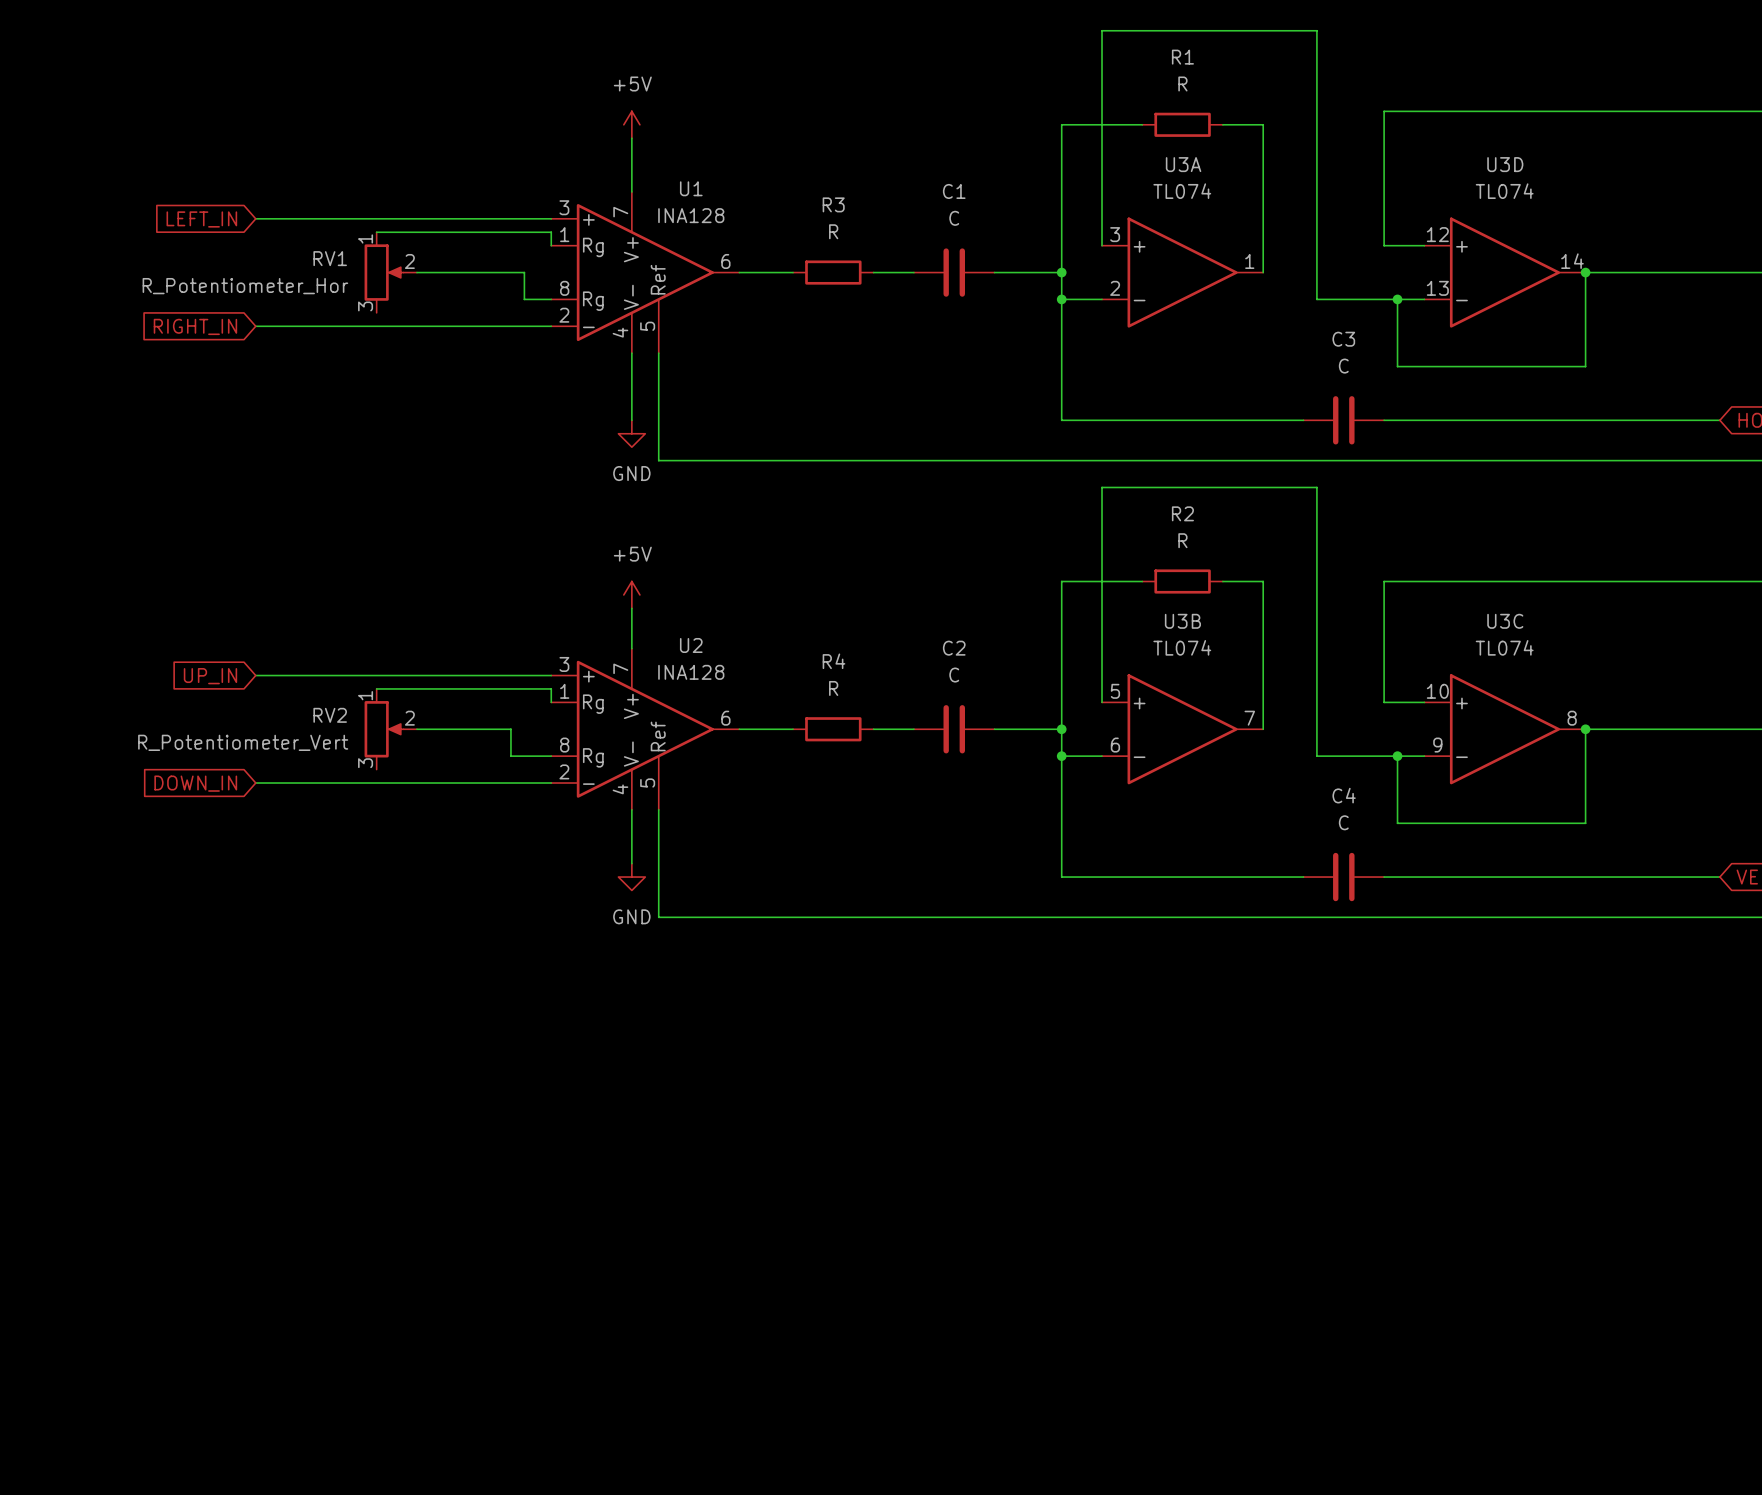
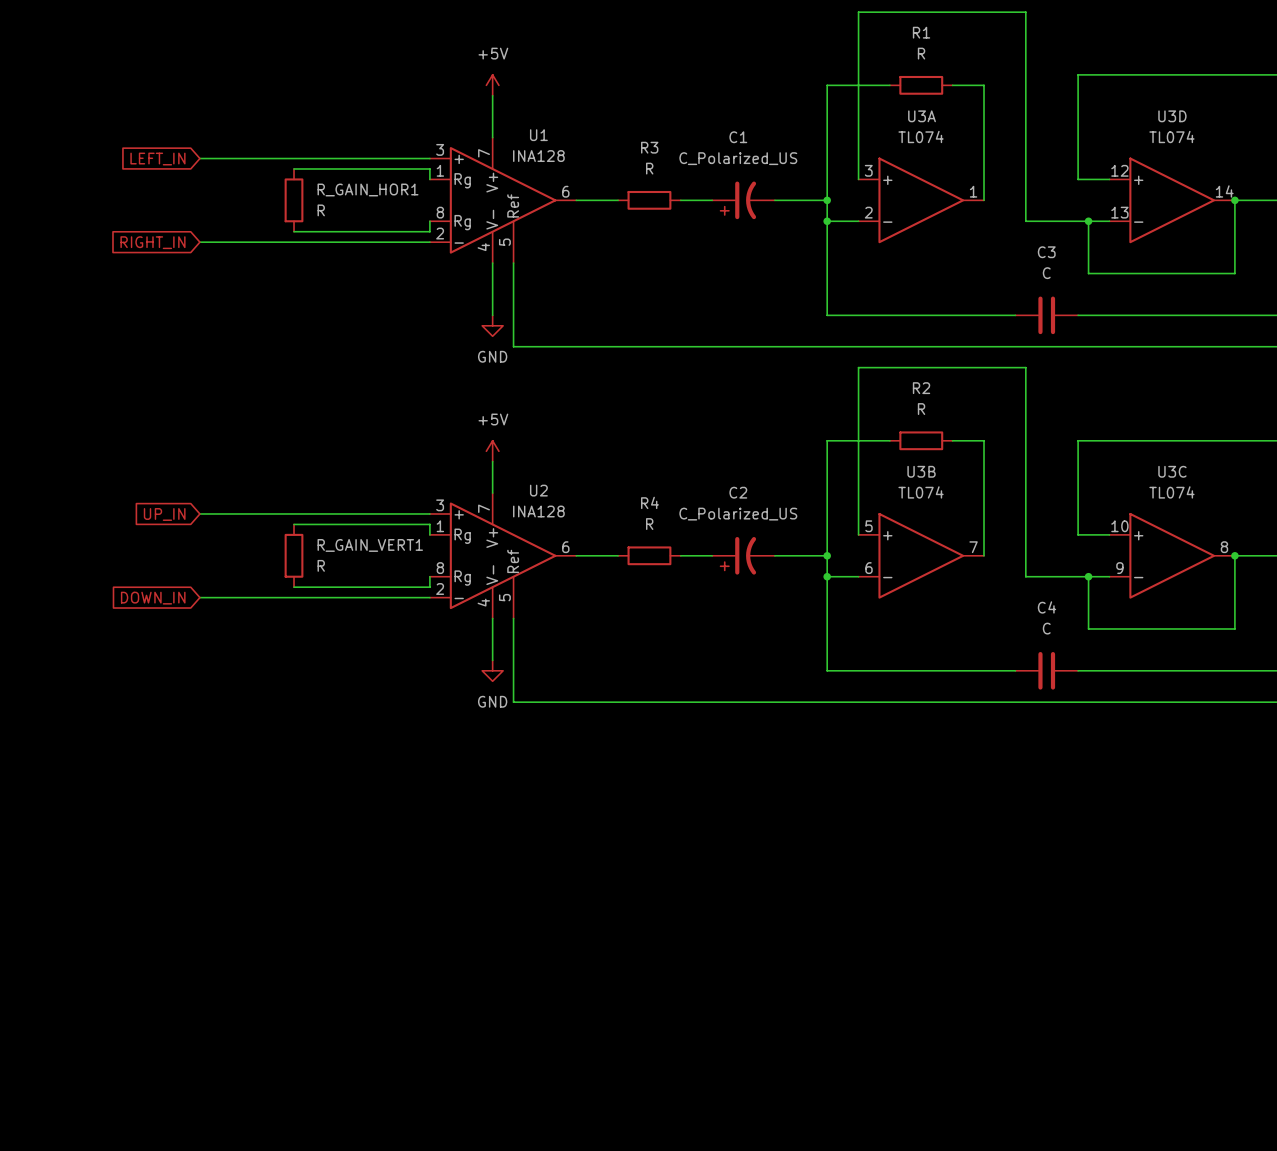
C1 value: C (954, 218) -> C_Polarized_US (738, 158)
C1 symbol: [913, 248, 995, 297] -> [712, 181, 775, 220]
R_GAIN_HOR1: none -> R (294, 200)
RV1: R_Potentiometer_Hor (390, 272) -> none
wire: (416, 272) (524, 272) (524, 299) (551, 299) -> (294, 231) (429, 231) (429, 221)
C2 value: C (954, 675) -> C_Polarized_US (738, 514)
C2 symbol: [913, 705, 995, 754] -> [712, 536, 775, 575]
R_GAIN_VERT1: none -> R (294, 555)
RV2: R_Potentiometer_Vert (390, 729) -> none
wire: (416, 729) (510, 729) (510, 756) (551, 756) -> (294, 587) (429, 587) (429, 576)

